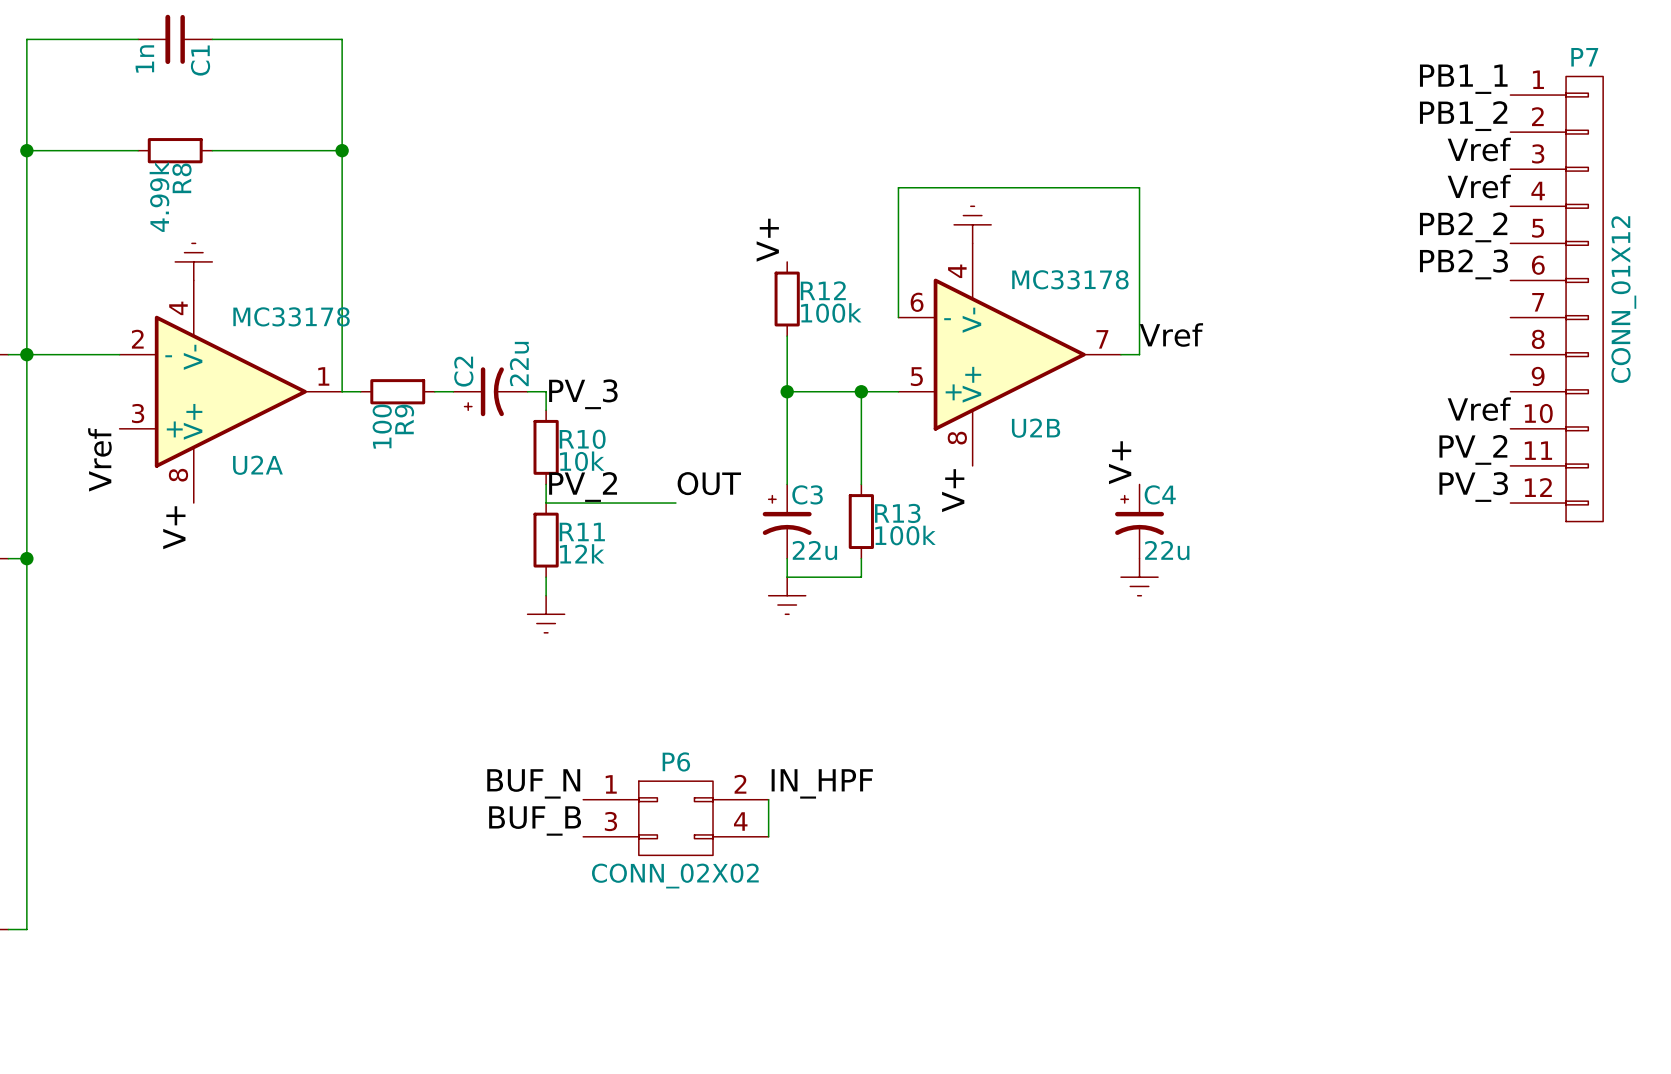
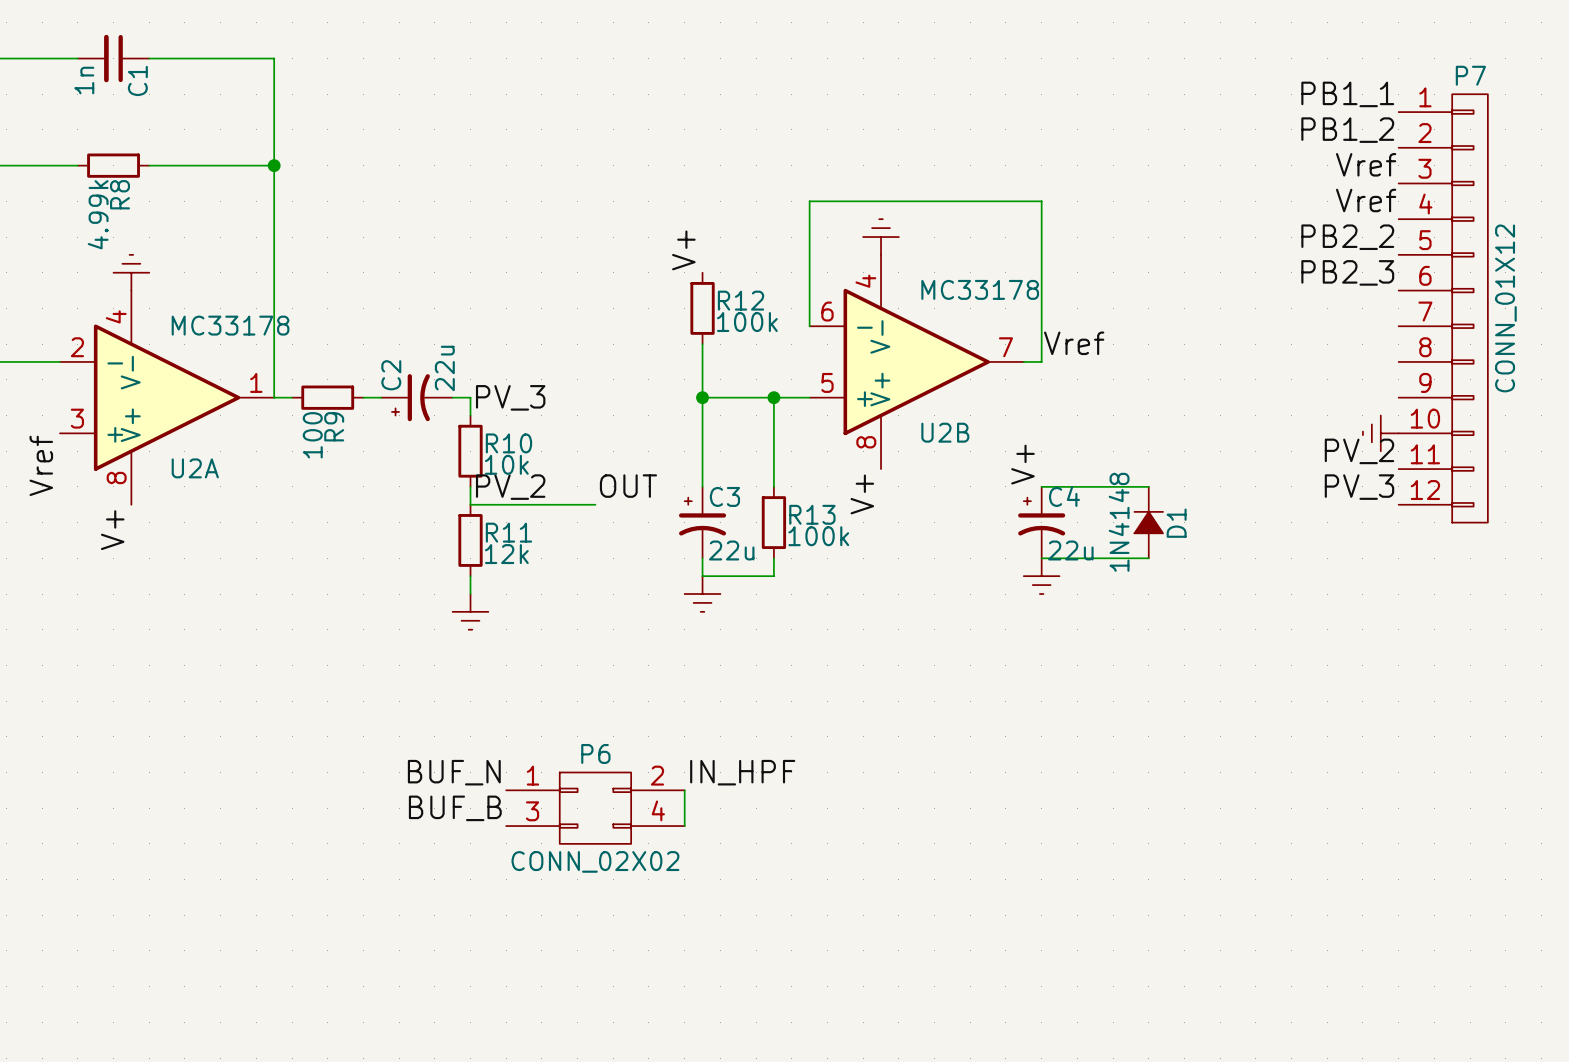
label: Vref (1479, 409) -> none
power symbol: none -> (1380, 433)
wire: none -> (1041, 486) (1148, 486)
D1: none -> 1N4148 (1148, 522)
wire: none -> (1041, 558) (1148, 558)

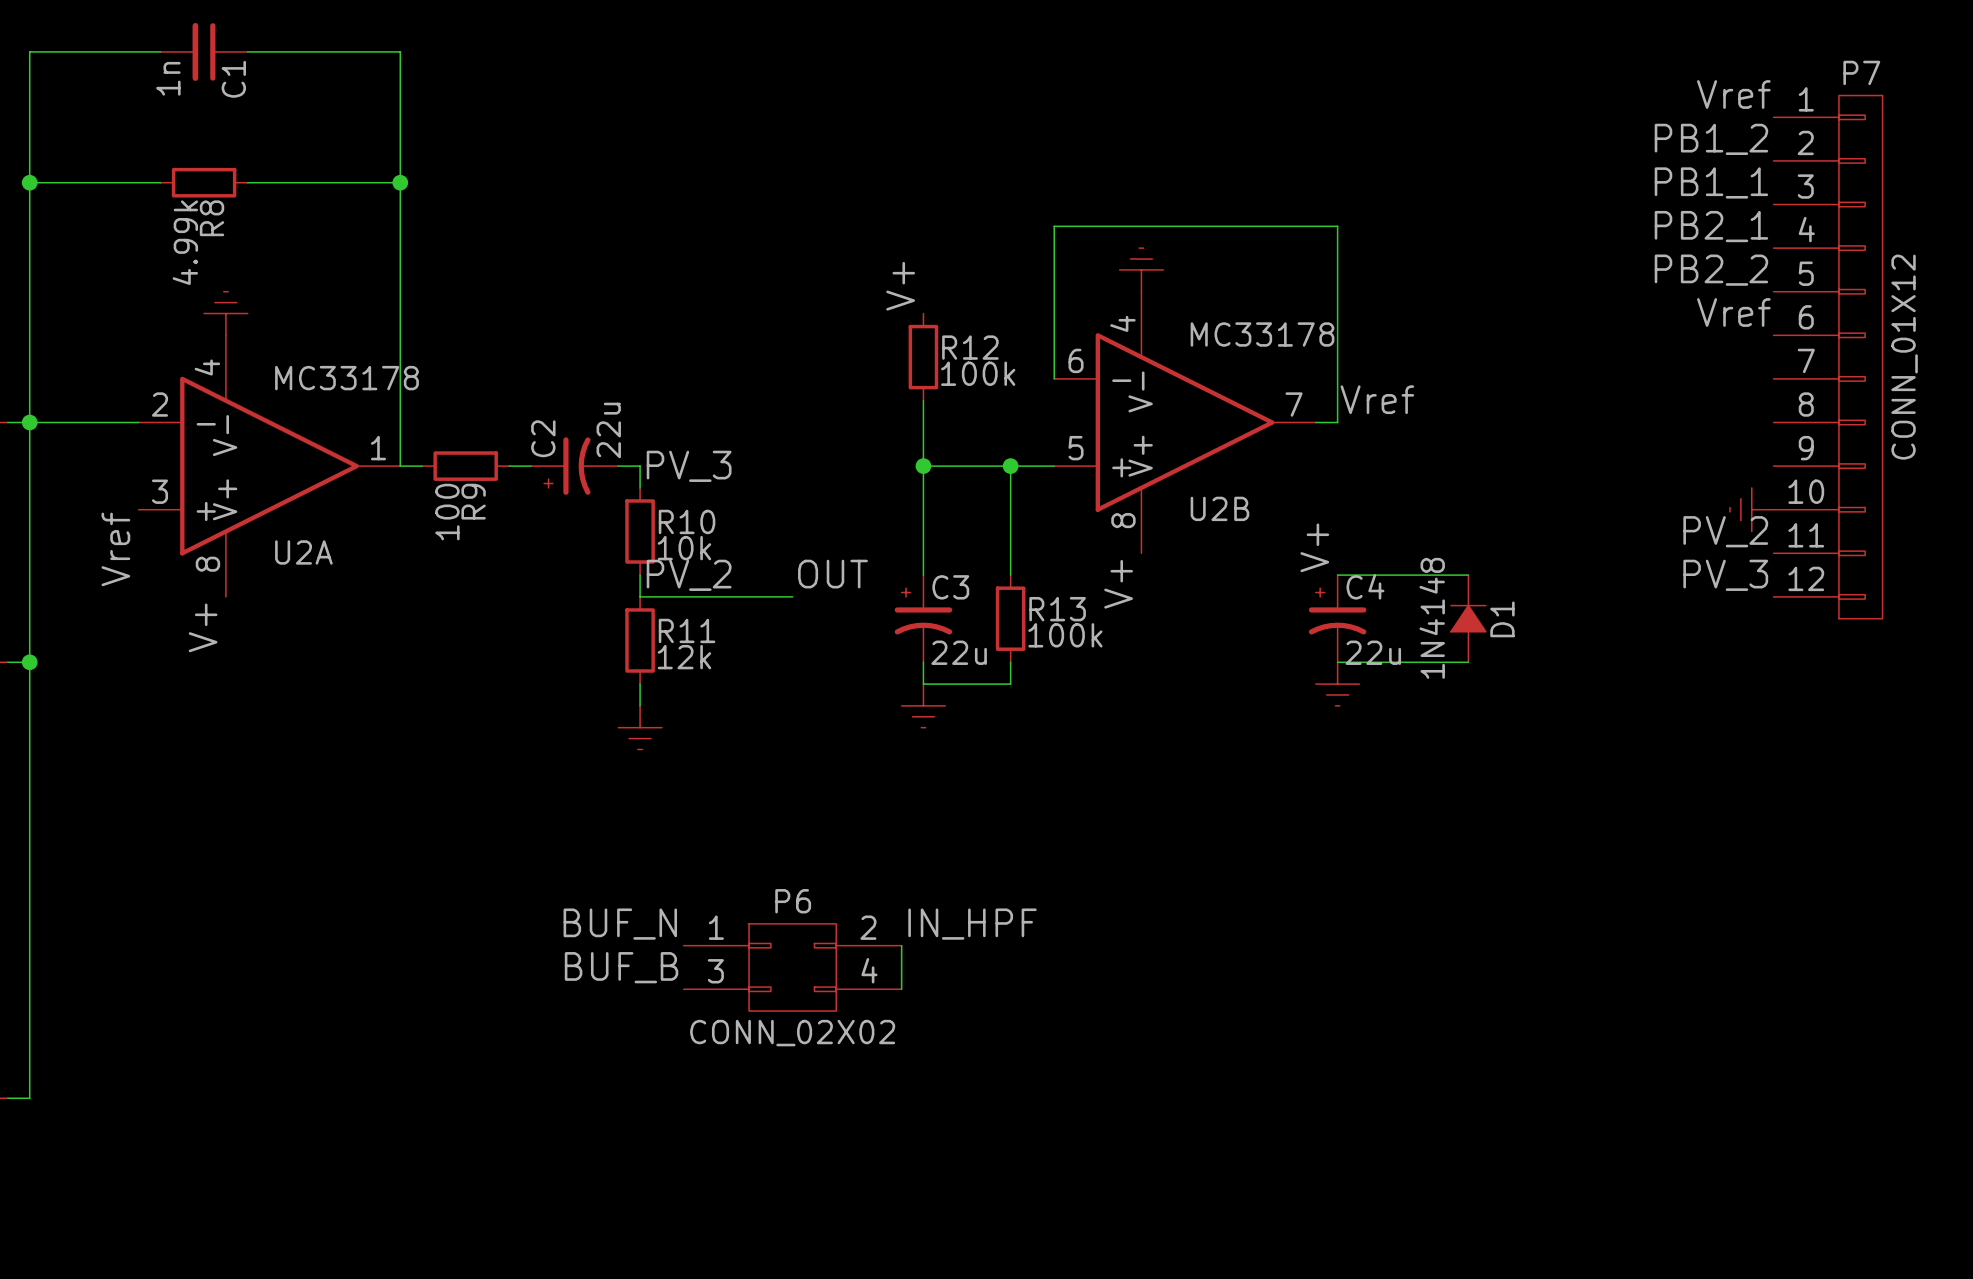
label: PB1_1 (1347, 94) -> Vref (1733, 94)
label: Vref (1366, 164) -> PB1_1 (1711, 182)
label: Vref (1366, 200) -> PB2_1 (1711, 226)
label: PB2_3 (1347, 272) -> Vref (1733, 312)

